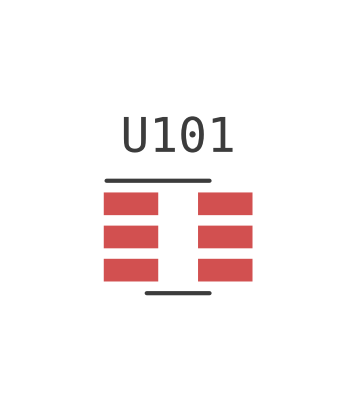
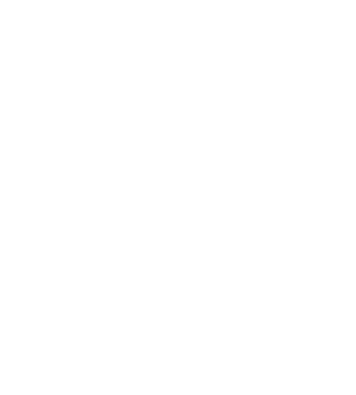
U101: (178, 236) -> none

